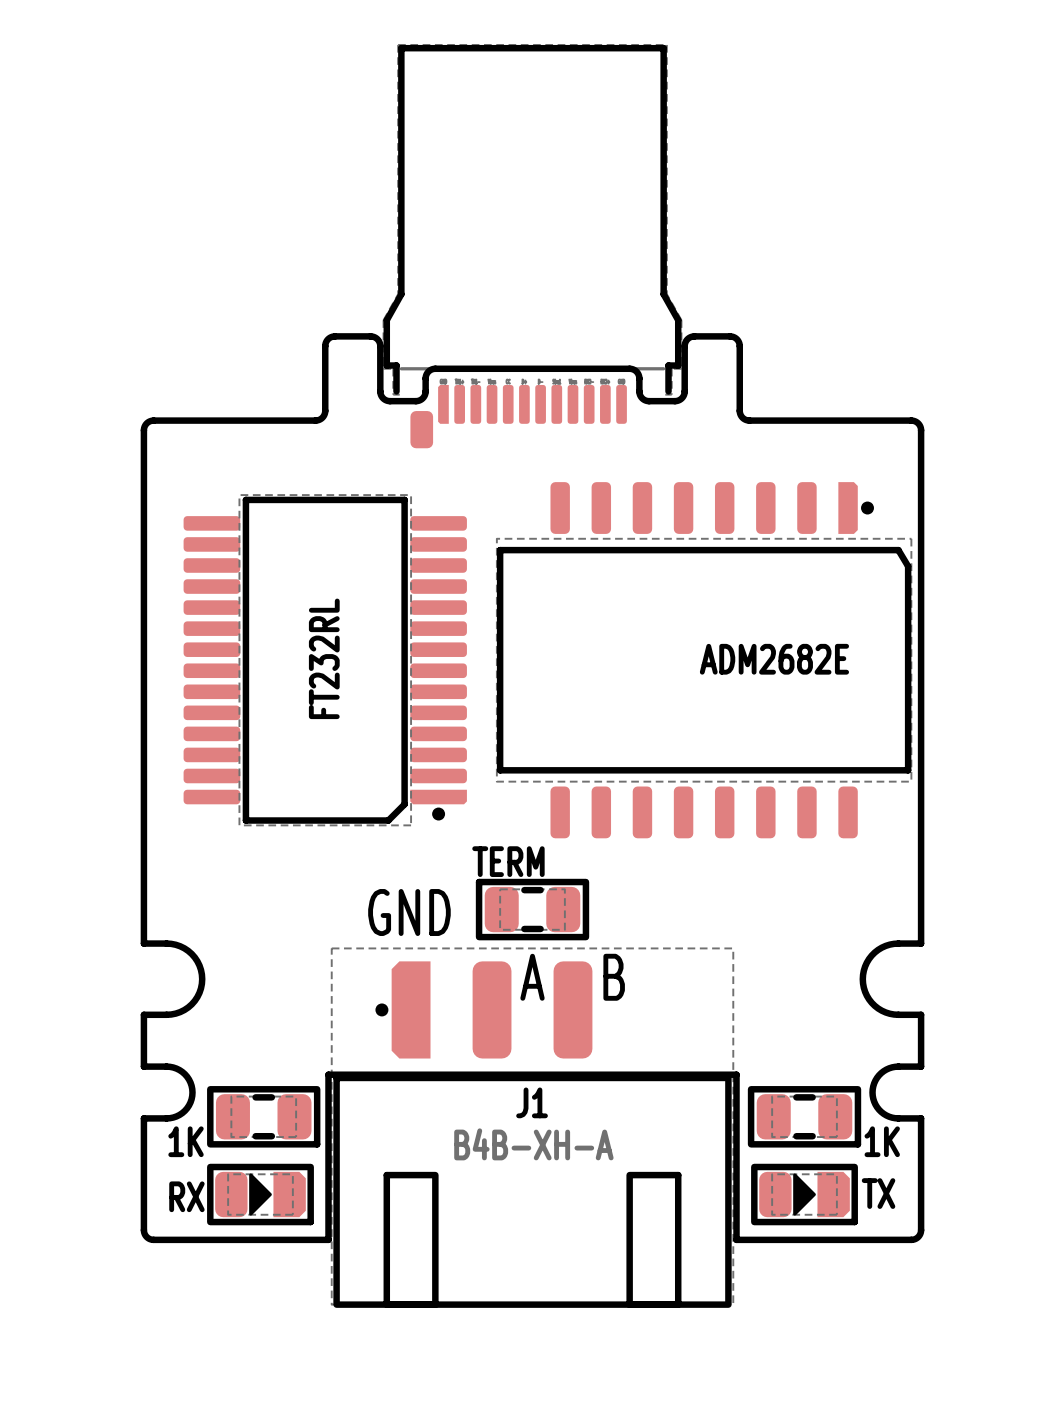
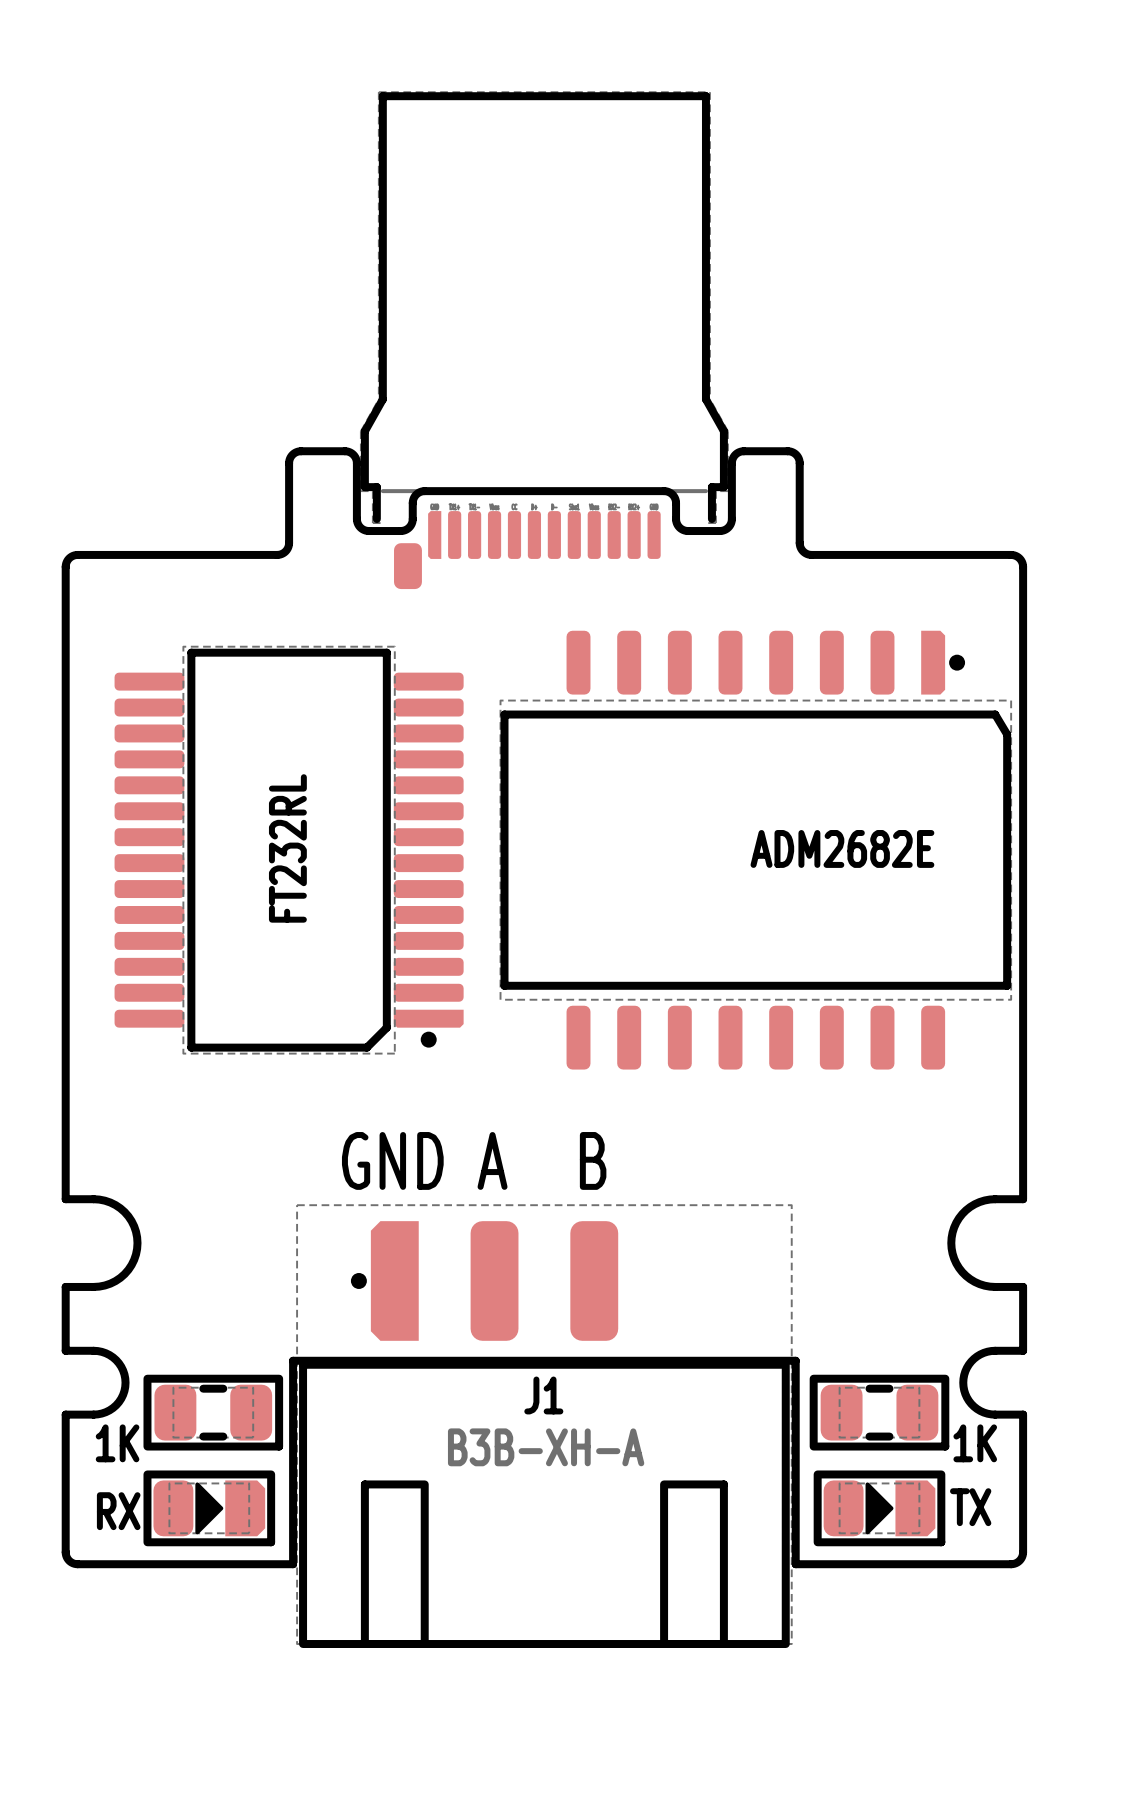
part: TERM (532, 909) -> none
text position: A (532, 977) -> A (492, 1160)
text position: B (614, 977) -> B (593, 1160)
J1 value: B4B-XH-A (533, 1144) -> B3B-XH-A (546, 1447)

